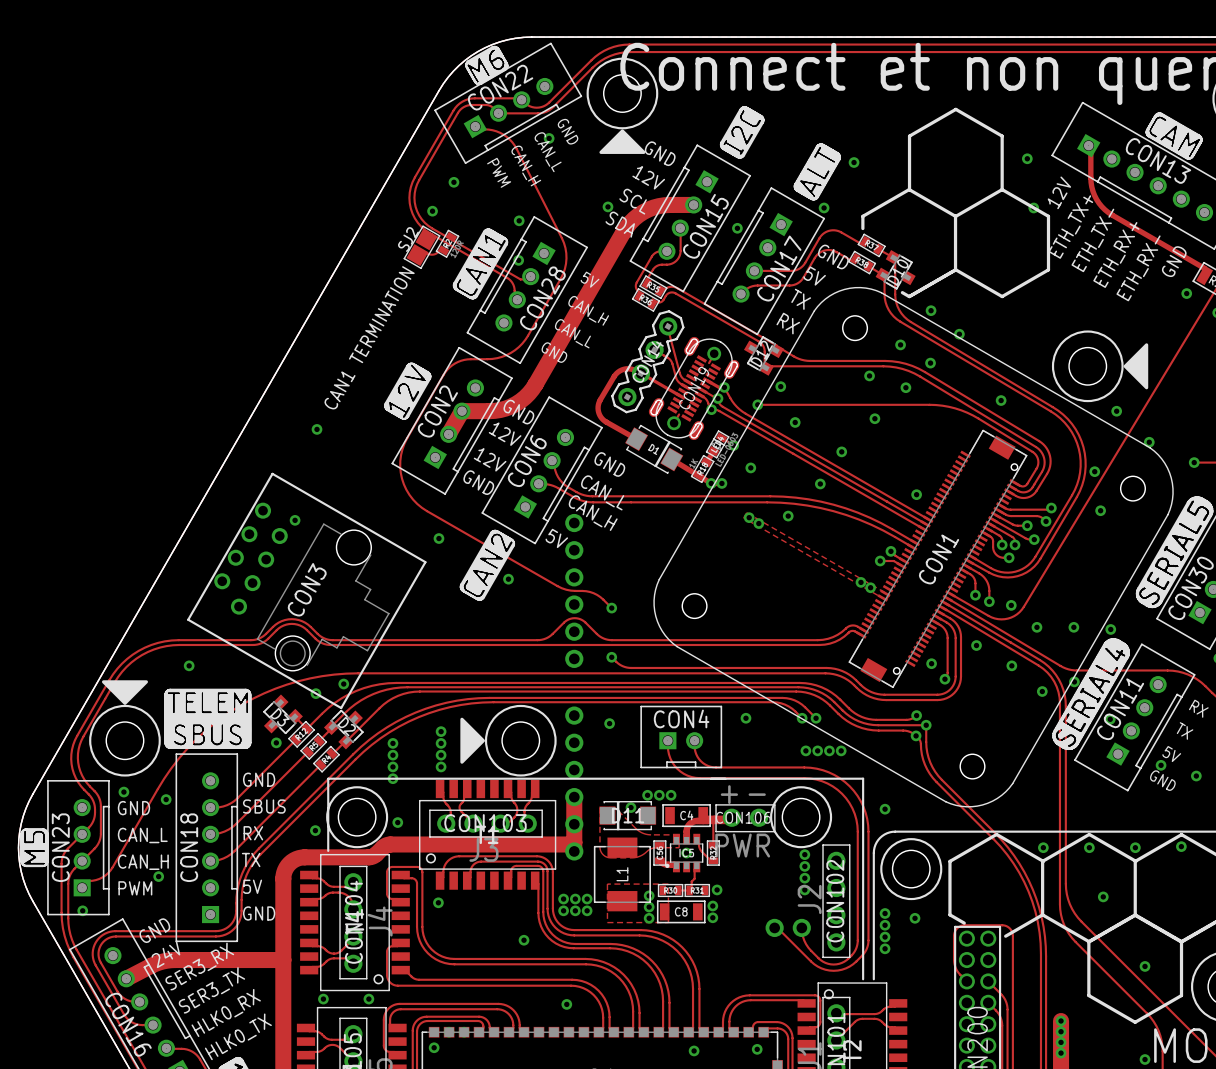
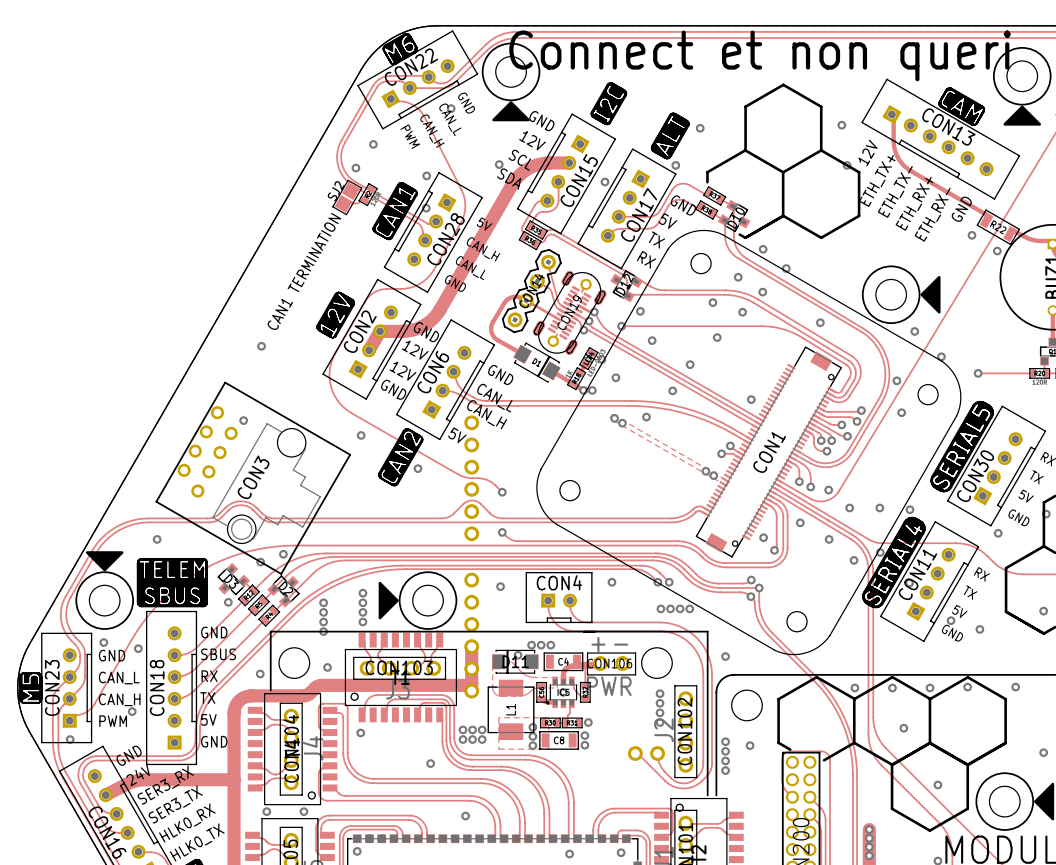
drawing: [326, 786, 389, 849] -> none
drawing: [770, 786, 833, 849] -> none
drawing: [880, 838, 943, 901] -> none

